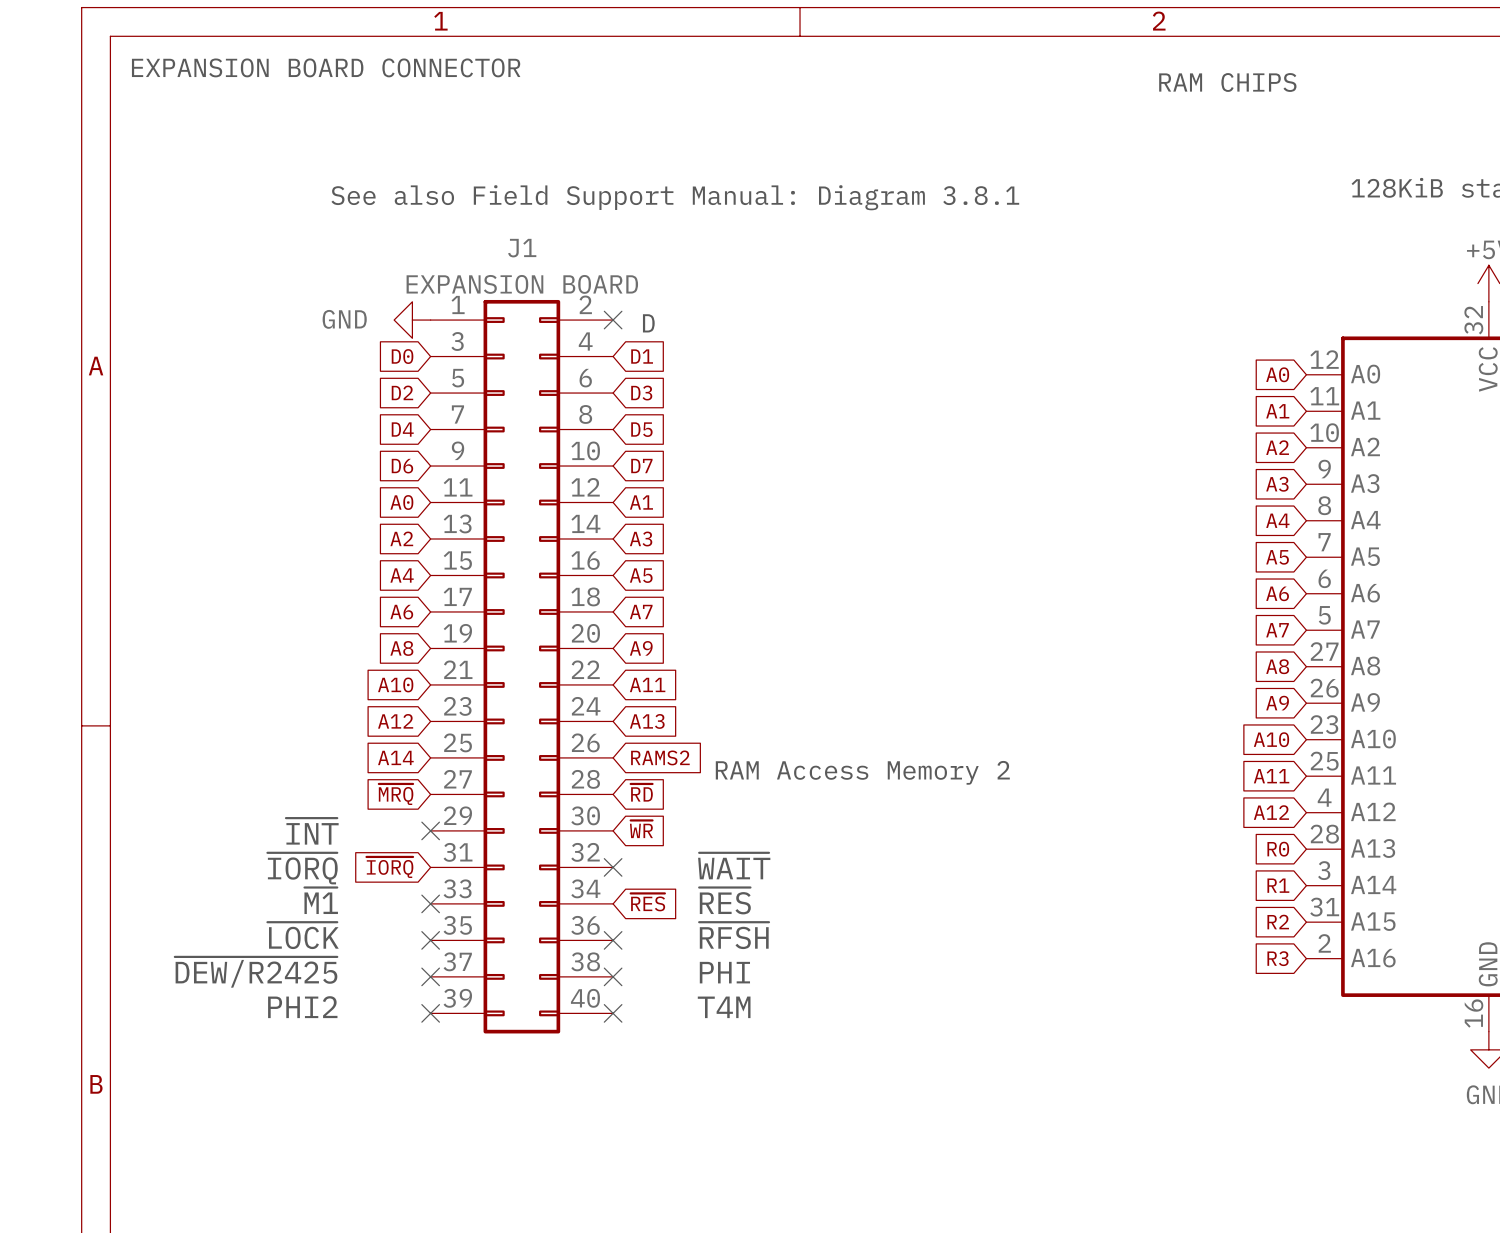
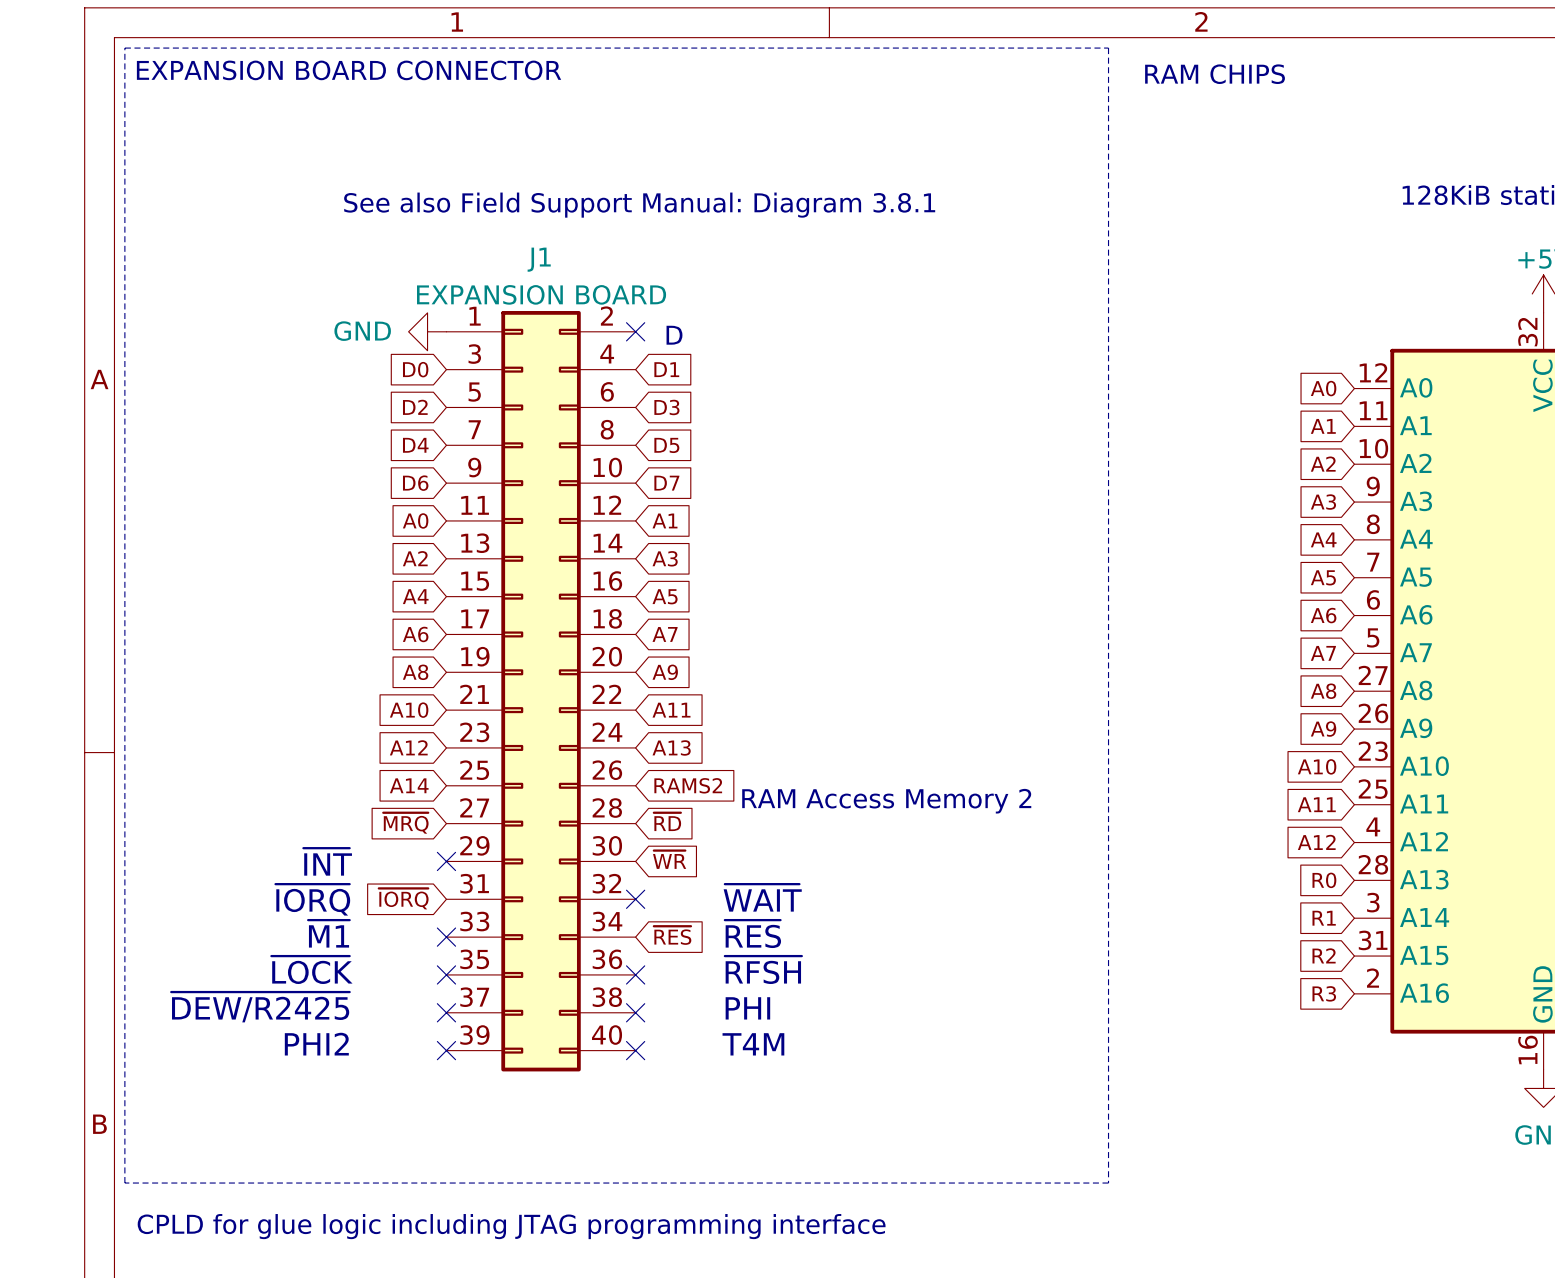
line: none -> (124, 48) (1108, 48) (1108, 1183) (124, 1183) (124, 48)
text position: RAM CHIPS (1227, 82) -> RAM CHIPS (1215, 74)
text: none -> CPLD for glue logic including JTAG programming interface (511, 1226)

